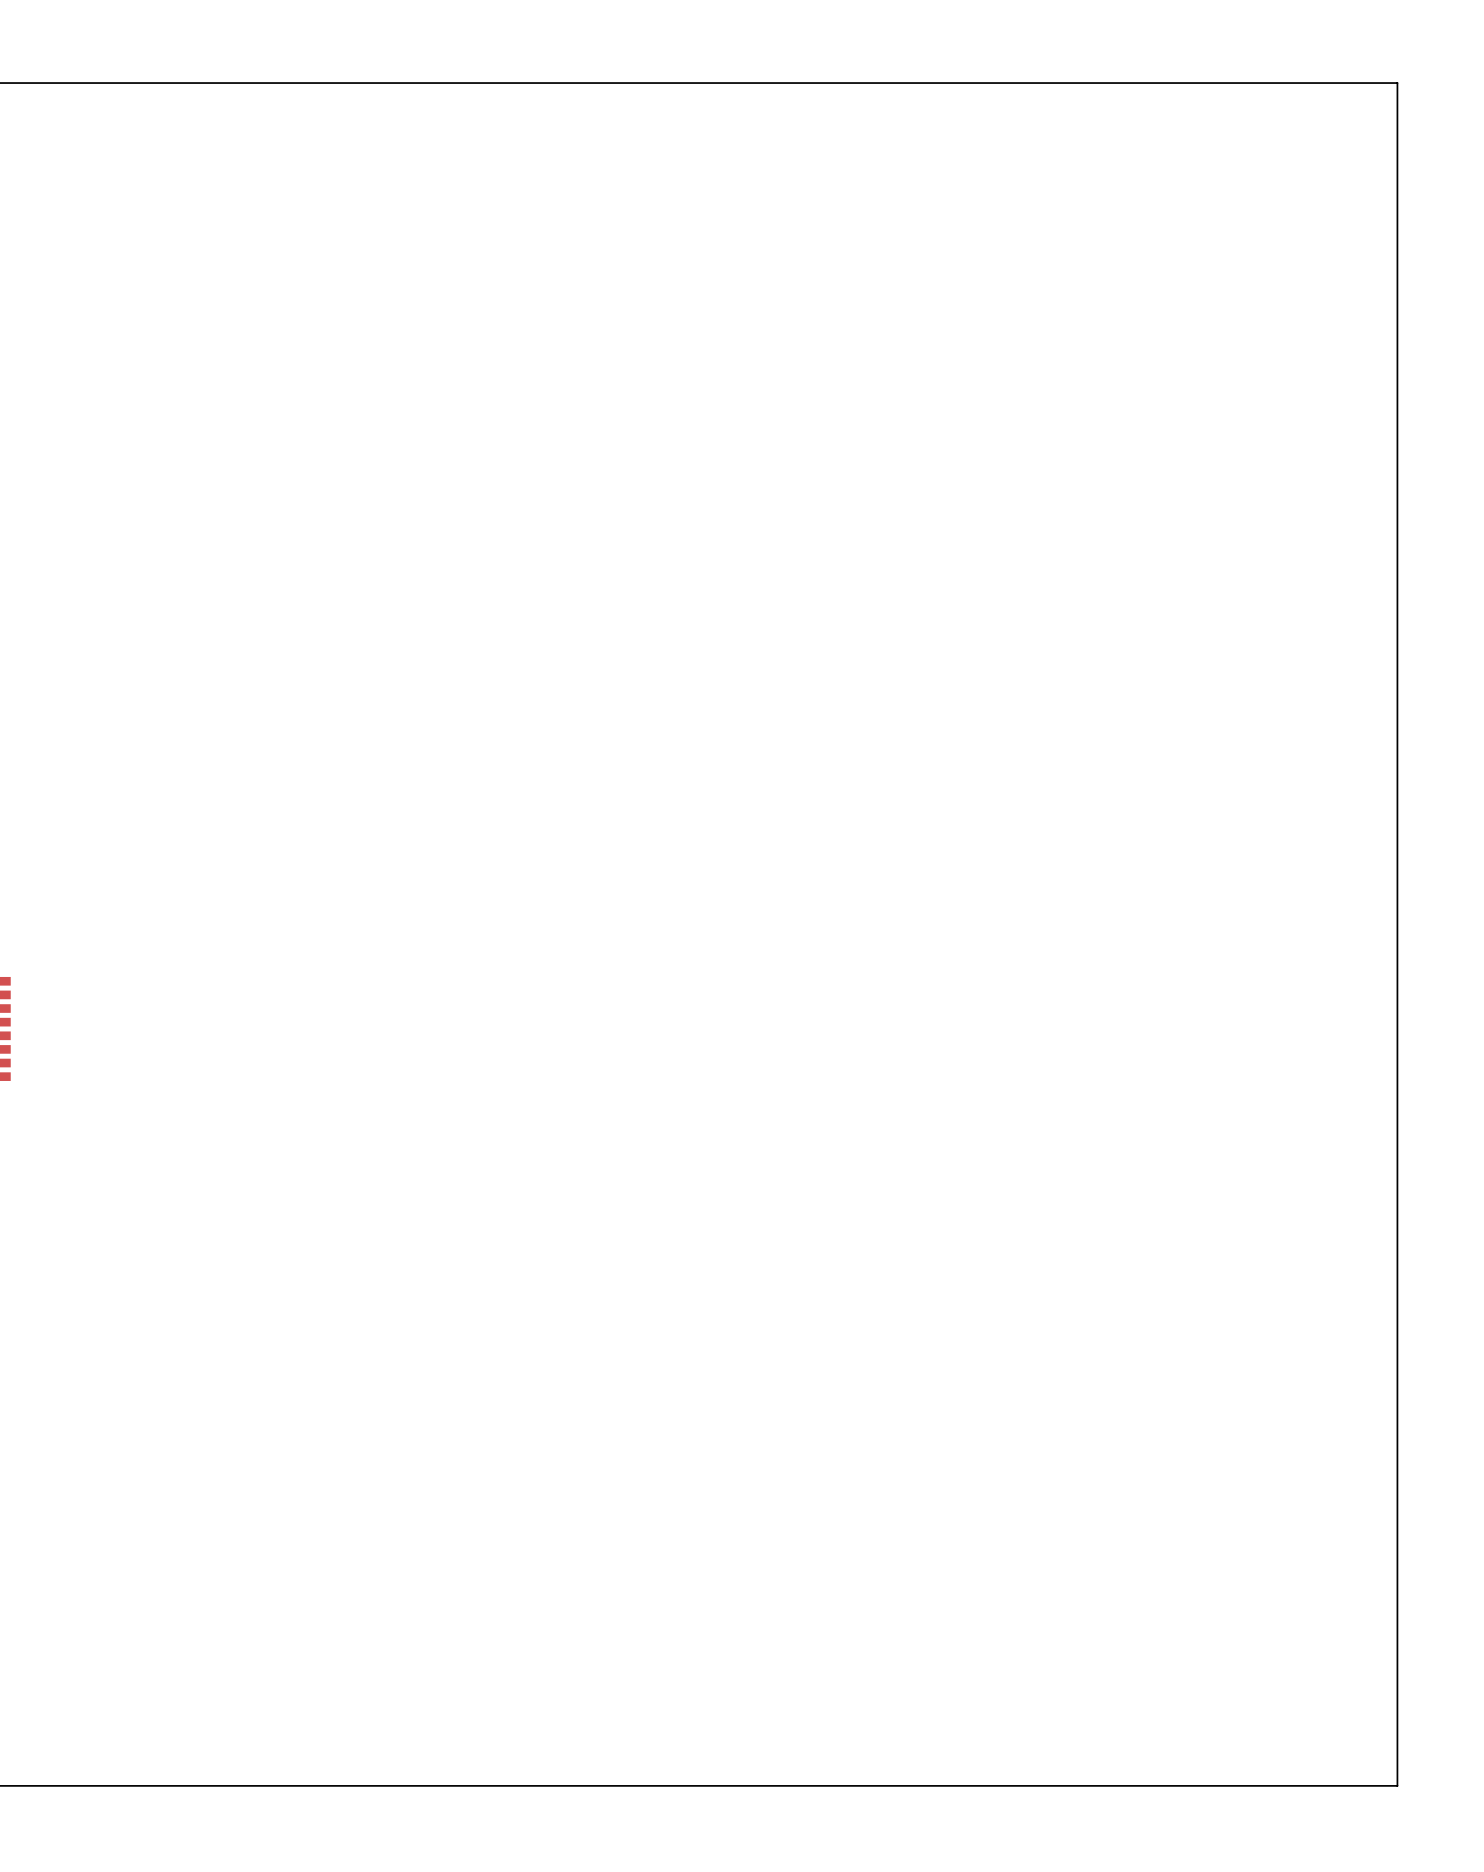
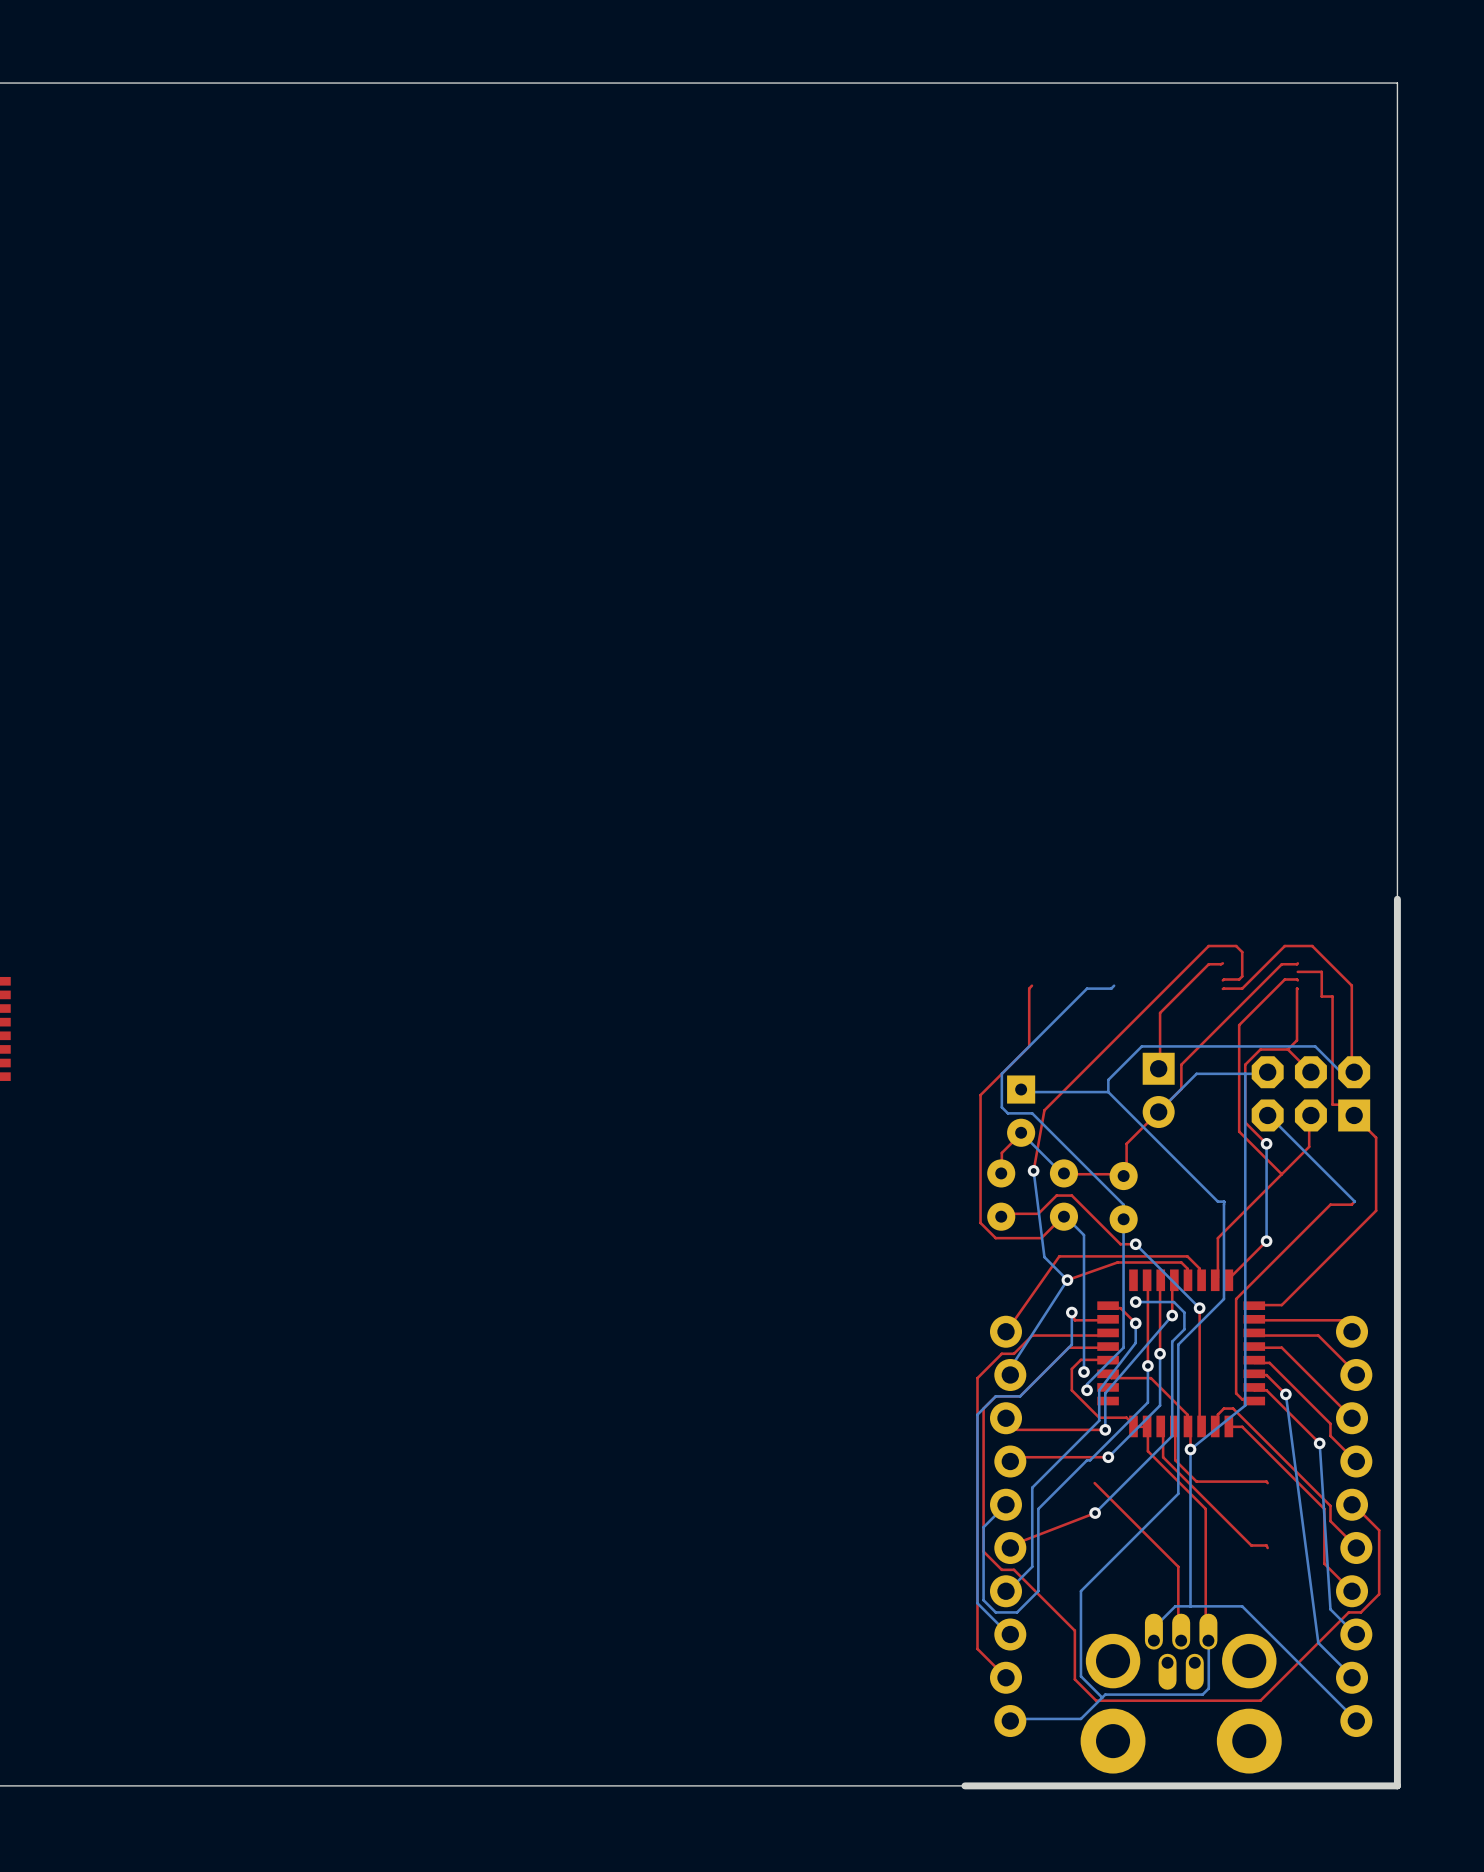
board edge width: thin (1397, 899) (1397, 1785) (964, 1785) -> thick (1397, 899) (1397, 1785) (964, 1785)
top track: none -> (1222, 963) (1208, 964) (1160, 1012) (1158, 1068)
top track: none -> (1297, 963) (1281, 964) (1181, 1064) (1181, 1089) (1126, 1143) (1126, 1174) (1123, 1176) (1123, 1174) (1063, 1173)
top track: none -> (1297, 971) (1321, 971) (1321, 996) (1332, 996) (1332, 1104) (1354, 1104) (1354, 1115) (1376, 1137) (1376, 1210) (1281, 1305) (1254, 1305)
top track: none -> (1222, 980) (1239, 979) (1242, 976) (1242, 952) (1236, 946) (1208, 946) (1044, 1110) (1033, 1170)
top track: none -> (1297, 980) (1284, 979) (1239, 1025) (1239, 1131) (1281, 1174)
top track: none -> (1031, 985) (1029, 988) (1029, 1046) (980, 1095) (980, 1222) (995, 1238) (1041, 1238) (1063, 1216)
bottom track: none -> (1114, 985) (1111, 988) (1087, 988) (1001, 1073) (1001, 1107) (1007, 1113) (1032, 1113) (1123, 1204) (1123, 1347) (1087, 1384) (1087, 1390)
top track: none -> (1222, 988) (1242, 988) (1284, 946) (1312, 946) (1351, 985) (1351, 1070) (1354, 1072)
top track: none -> (1297, 988) (1297, 1040) (1287, 1049)
top track: none -> (1287, 1049) (1310, 1072)
top track: none -> (1287, 1049) (1260, 1049) (1245, 1064) (1245, 1122) (1266, 1143)
bottom track: none -> (1267, 1072) (1266, 1073) (1196, 1073) (1158, 1112)
bottom track: none -> (1354, 1072) (1339, 1070) (1315, 1046) (1141, 1046) (1108, 1079) (1108, 1092)
bottom track: none -> (1245, 1073) (1245, 1405) (1190, 1449) (1190, 1606)
bottom track: none -> (1021, 1089) (1023, 1092) (1108, 1092)
part: none -> (1158, 1090)
bottom track: none -> (1108, 1092) (1217, 1201) (1224, 1201) (1223, 1299) (1178, 1344) (1178, 1493) (1080, 1591) (1080, 1676) (1102, 1697)
part: none -> (1310, 1093)
part: none -> (1021, 1111)
bottom track: none -> (1267, 1115) (1354, 1201)
top track: none -> (1310, 1115) (1309, 1116) (1309, 1146) (1217, 1238) (1217, 1277) (1215, 1280)
top track: none -> (1021, 1132) (1001, 1152) (1001, 1173)
bottom track: none -> (1021, 1132) (1063, 1173)
bottom track: none -> (1266, 1143) (1266, 1241)
via: none -> (1266, 1143)
bottom track: none -> (1033, 1170) (1044, 1257) (1067, 1280) (1007, 1372) (1010, 1374)
via: none -> (1033, 1170)
part: none -> (1001, 1195)
part: none -> (1063, 1195)
part: none -> (1123, 1197)
top track: none -> (1354, 1201) (1351, 1204) (1330, 1204) (1236, 1299) (1236, 1393) (1242, 1399) (1254, 1401)
top track: none -> (1001, 1216) (1001, 1213) (1038, 1213) (1056, 1195) (1071, 1195) (1120, 1244) (1135, 1244)
bottom track: none -> (1063, 1216) (1084, 1235) (1084, 1372)
top track: none -> (1266, 1241) (1228, 1280)
via: none -> (1266, 1241)
bottom track: none -> (1135, 1244) (1199, 1308)
via: none -> (1135, 1244)
top track: none -> (1067, 1280) (1117, 1262) (1181, 1262) (1187, 1268) (1187, 1280)
via: none -> (1067, 1280)
top track: none -> (1147, 1280) (1147, 1365)
top track: none -> (1160, 1280) (1160, 1353)
top track: none -> (1174, 1280) (1172, 1280) (1172, 1315)
top track: none -> (1201, 1280) (1199, 1277) (1199, 1268) (1187, 1256) (1059, 1256) (1005, 1331)
bottom track: none -> (1135, 1302) (1173, 1302) (1184, 1312) (1184, 1329) (1172, 1341) (1172, 1435) (1095, 1513)
via: none -> (1135, 1302)
top track: none -> (1108, 1305) (1108, 1308) (1120, 1308) (1135, 1323)
top track: none -> (1199, 1308) (1199, 1423) (1201, 1426)
via: none -> (1199, 1308)
top track: none -> (1071, 1312) (1074, 1320) (1108, 1319)
bottom track: none -> (1071, 1312) (1071, 1344) (1020, 1396) (995, 1396) (977, 1414) (977, 1603) (1010, 1634)
via: none -> (1071, 1312)
bottom track: none -> (1172, 1315) (1105, 1393) (1105, 1429)
via: none -> (1172, 1315)
top track: none -> (1254, 1319) (1342, 1320) (1352, 1331)
bottom track: none -> (1135, 1323) (1135, 1342) (1099, 1390) (1099, 1420) (1032, 1487) (1032, 1566) (1005, 1591)
via: none -> (1135, 1323)
top track: none -> (1108, 1332) (1105, 1335) (1032, 1335) (1014, 1353) (1001, 1353) (977, 1378) (977, 1648) (1005, 1677)
top track: none -> (1254, 1332) (1254, 1335) (1318, 1335) (1356, 1374)
top track: none -> (1108, 1346) (1068, 1347) (1020, 1396) (995, 1396) (983, 1408) (983, 1551) (1001, 1569) (1014, 1569) (1074, 1630) (1074, 1679) (1096, 1700) (1260, 1700) (1348, 1612) (1360, 1612) (1379, 1594) (1379, 1530) (1352, 1504)
top track: none -> (1254, 1346) (1281, 1347) (1352, 1418)
bottom track: none -> (1160, 1353) (1160, 1405) (1108, 1457)
via: none -> (1160, 1353)
part: none -> (1181, 1353)
top track: none -> (1108, 1360) (1080, 1359) (1071, 1369) (1071, 1390) (1099, 1417) (1126, 1417) (1133, 1426) (1147, 1426) (1147, 1451) (1205, 1508) (1205, 1639) (1208, 1640)
top track: none -> (1254, 1360) (1254, 1362) (1269, 1362) (1330, 1423) (1330, 1435) (1356, 1461)
bottom track: none -> (1147, 1365) (1147, 1402) (1038, 1508) (1038, 1591) (1017, 1612) (995, 1612) (983, 1600) (983, 1527) (1005, 1504)
via: none -> (1147, 1365)
via: none -> (1084, 1372)
top track: none -> (1108, 1373) (1111, 1378) (1150, 1378) (1187, 1414) (1187, 1426) (1190, 1426) (1190, 1449)
top track: none -> (1254, 1373) (1266, 1375) (1285, 1394)
top track: none -> (1254, 1387) (1254, 1390) (1266, 1390) (1319, 1443)
via: none -> (1087, 1390)
bottom track: none -> (1285, 1394) (1318, 1642) (1352, 1677)
via: none -> (1285, 1394)
top track: none -> (1005, 1418) (1017, 1429) (1105, 1429)
top track: none -> (1160, 1426) (1163, 1426) (1163, 1457) (1251, 1545) (1266, 1545) (1267, 1548)
top track: none -> (1174, 1426) (1175, 1460) (1196, 1481) (1266, 1481) (1267, 1483)
top track: none -> (1215, 1426) (1217, 1423) (1217, 1414) (1223, 1408) (1233, 1408) (1330, 1505) (1330, 1521) (1356, 1548)
top track: none -> (1228, 1426) (1242, 1426) (1324, 1508) (1324, 1563) (1351, 1591)
via: none -> (1105, 1429)
bottom track: none -> (1319, 1443) (1330, 1609) (1356, 1634)
via: none -> (1319, 1443)
via: none -> (1190, 1449)
top track: none -> (1108, 1457) (1014, 1457) (1010, 1461)
via: none -> (1108, 1457)
top track: none -> (1094, 1483) (1178, 1566) (1178, 1639) (1181, 1640)
top track: none -> (1095, 1513) (1010, 1545) (1010, 1548)
via: none -> (1095, 1513)
part: none -> (1008, 1526)
part: none -> (1354, 1526)
bottom track: none -> (1153, 1640) (1153, 1627) (1175, 1606) (1242, 1606) (1356, 1721)
bottom track: none -> (1208, 1640) (1208, 1688) (1202, 1694) (1105, 1694) (1080, 1718) (1010, 1718) (1010, 1721)
part: none -> (1181, 1693)

